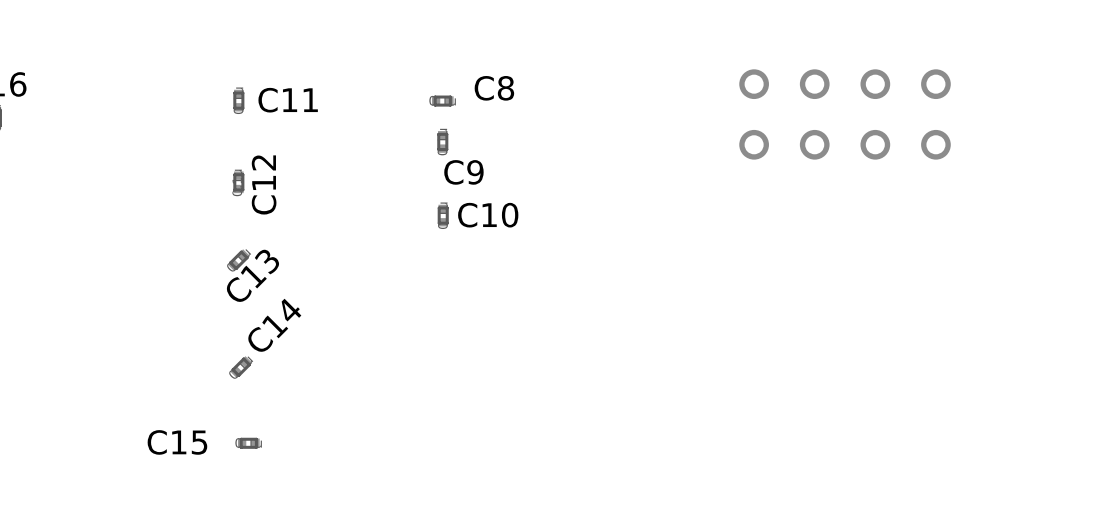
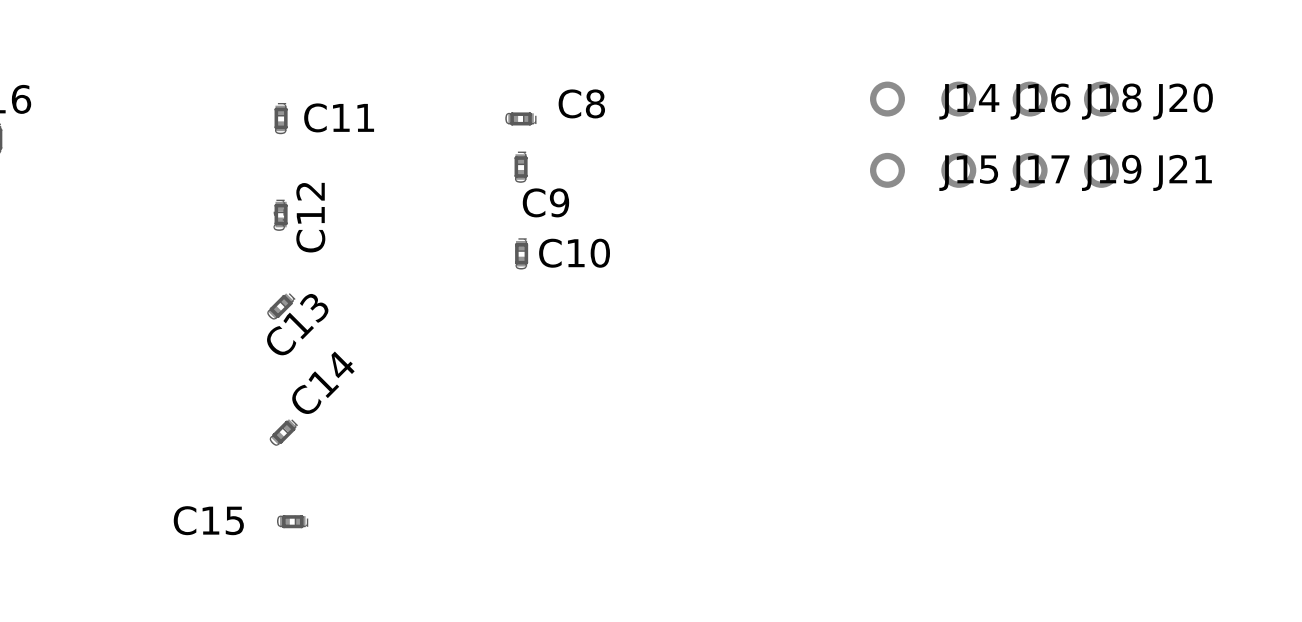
J14 name: none -> J14 (969, 101)
J16 name: none -> J16 (1040, 101)
J18 name: none -> J18 (1111, 101)
J20 name: none -> J20 (1183, 101)
J19 name: none -> J19 (1111, 172)
J21 name: none -> J21 (1182, 172)
J15 name: none -> J15 (968, 173)
J17 name: none -> J17 (1040, 173)

